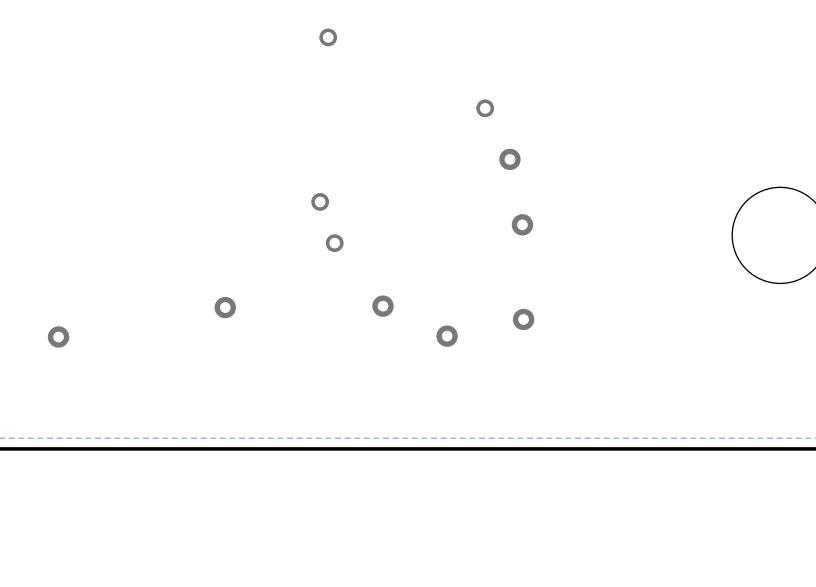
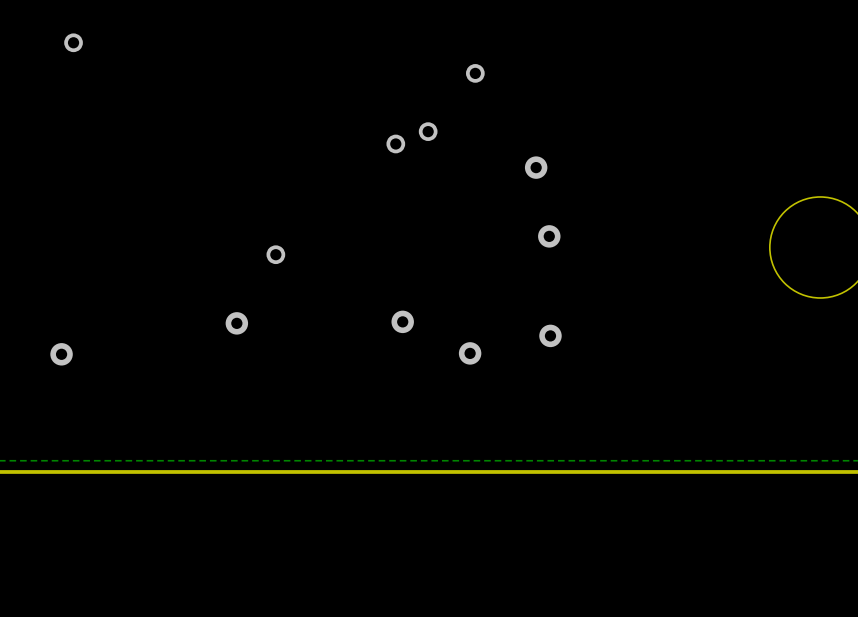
via: (328, 37) -> none
via: none -> (73, 42)
via: none -> (475, 73)
via: (485, 108) -> none
via: none -> (428, 131)
via: none -> (395, 143)
via: (320, 201) -> none
via: none -> (275, 254)
via: (334, 243) -> none

